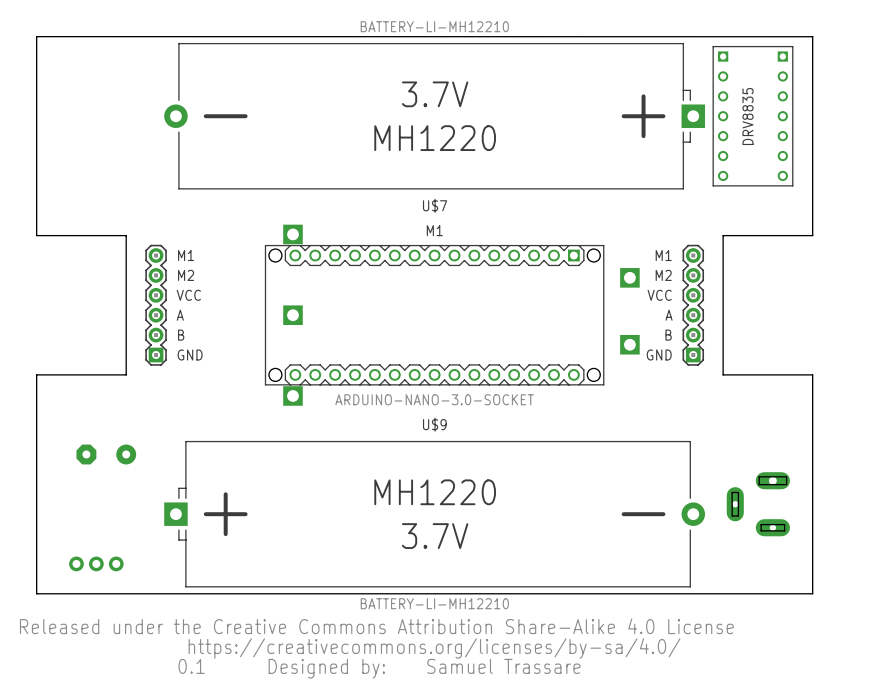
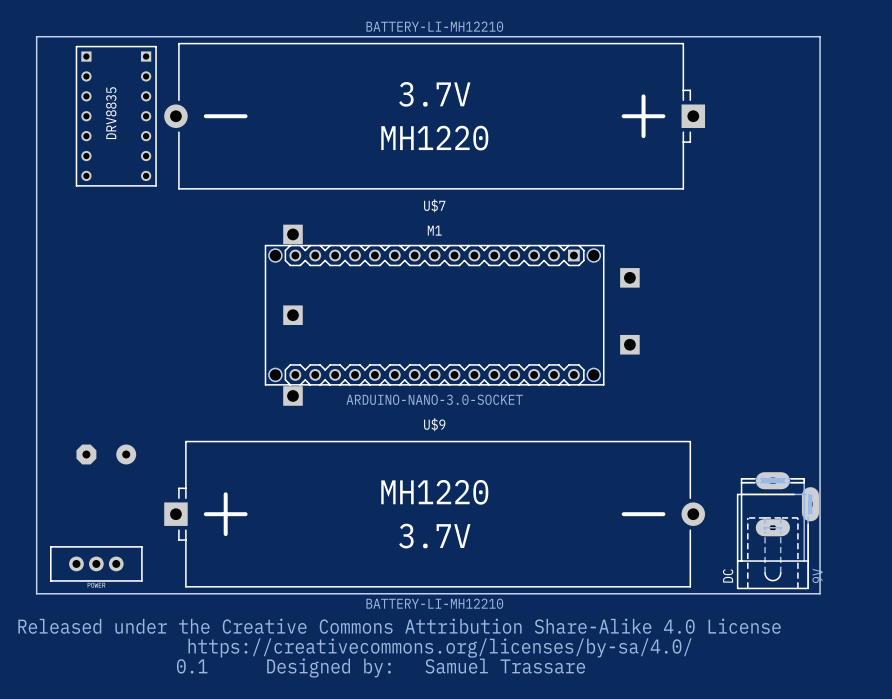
board edge: (36, 36) (812, 36) -> (36, 36) (820, 36) (820, 593) (812, 593)
board edge: (812, 36) (812, 235) (723, 235) (723, 374) (812, 374) (812, 593) -> none
part: none -> (116, 116)
part: (752, 116) -> none
board edge: (36, 235) (126, 235) (126, 374) (36, 374) -> (36, 235) (36, 374)
part: (156, 305) -> none
part: (693, 305) -> none
DC side: bottom (758, 504) -> top (778, 530)
part side: bottom (96, 563) -> top (96, 563)

